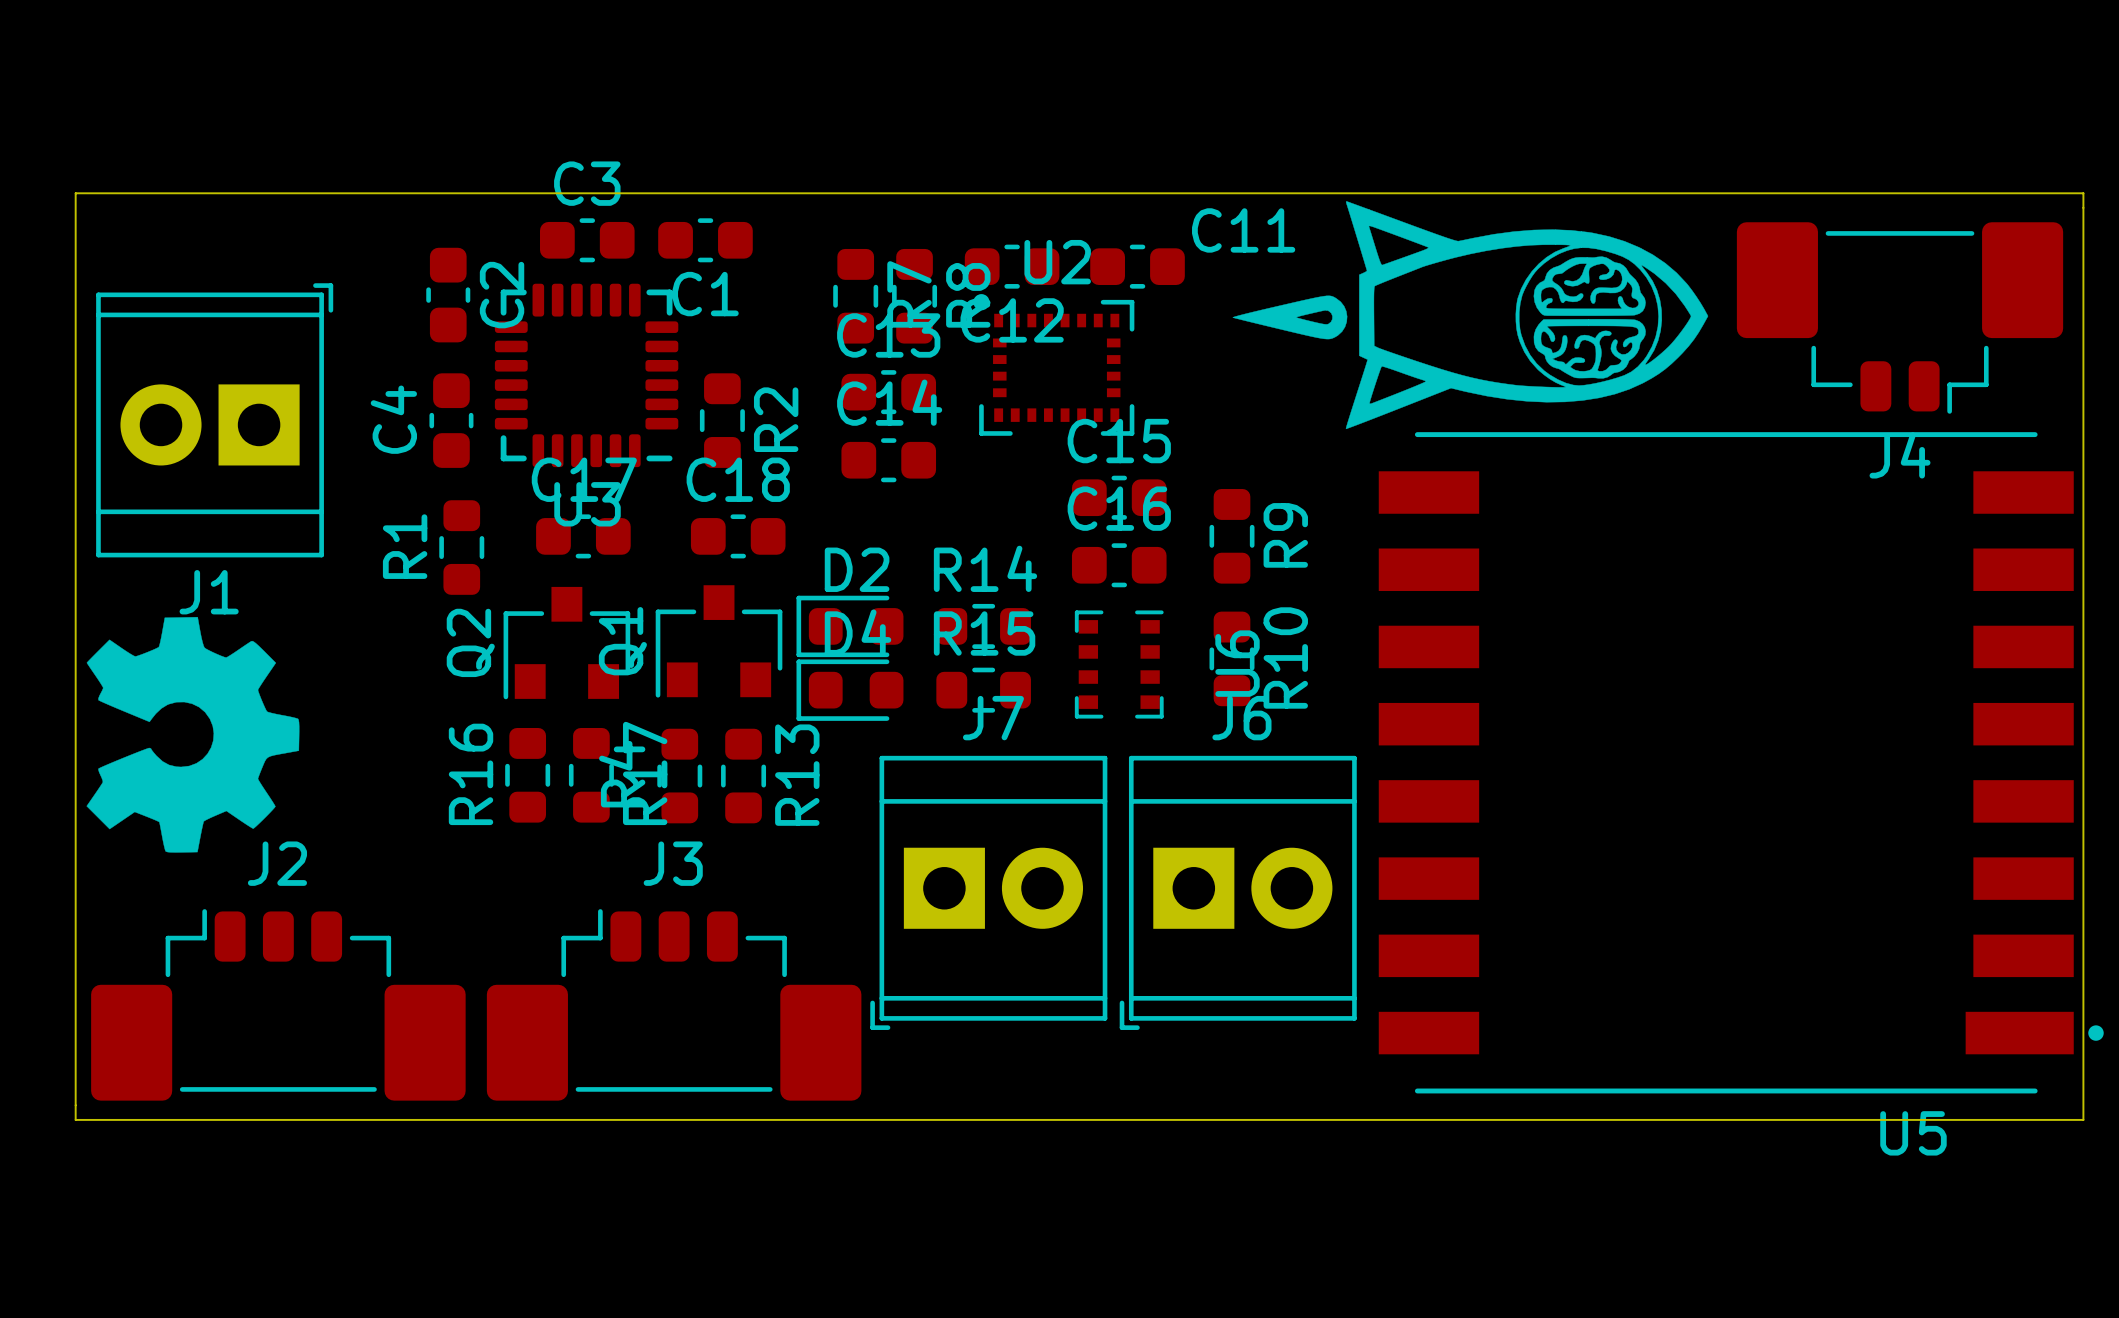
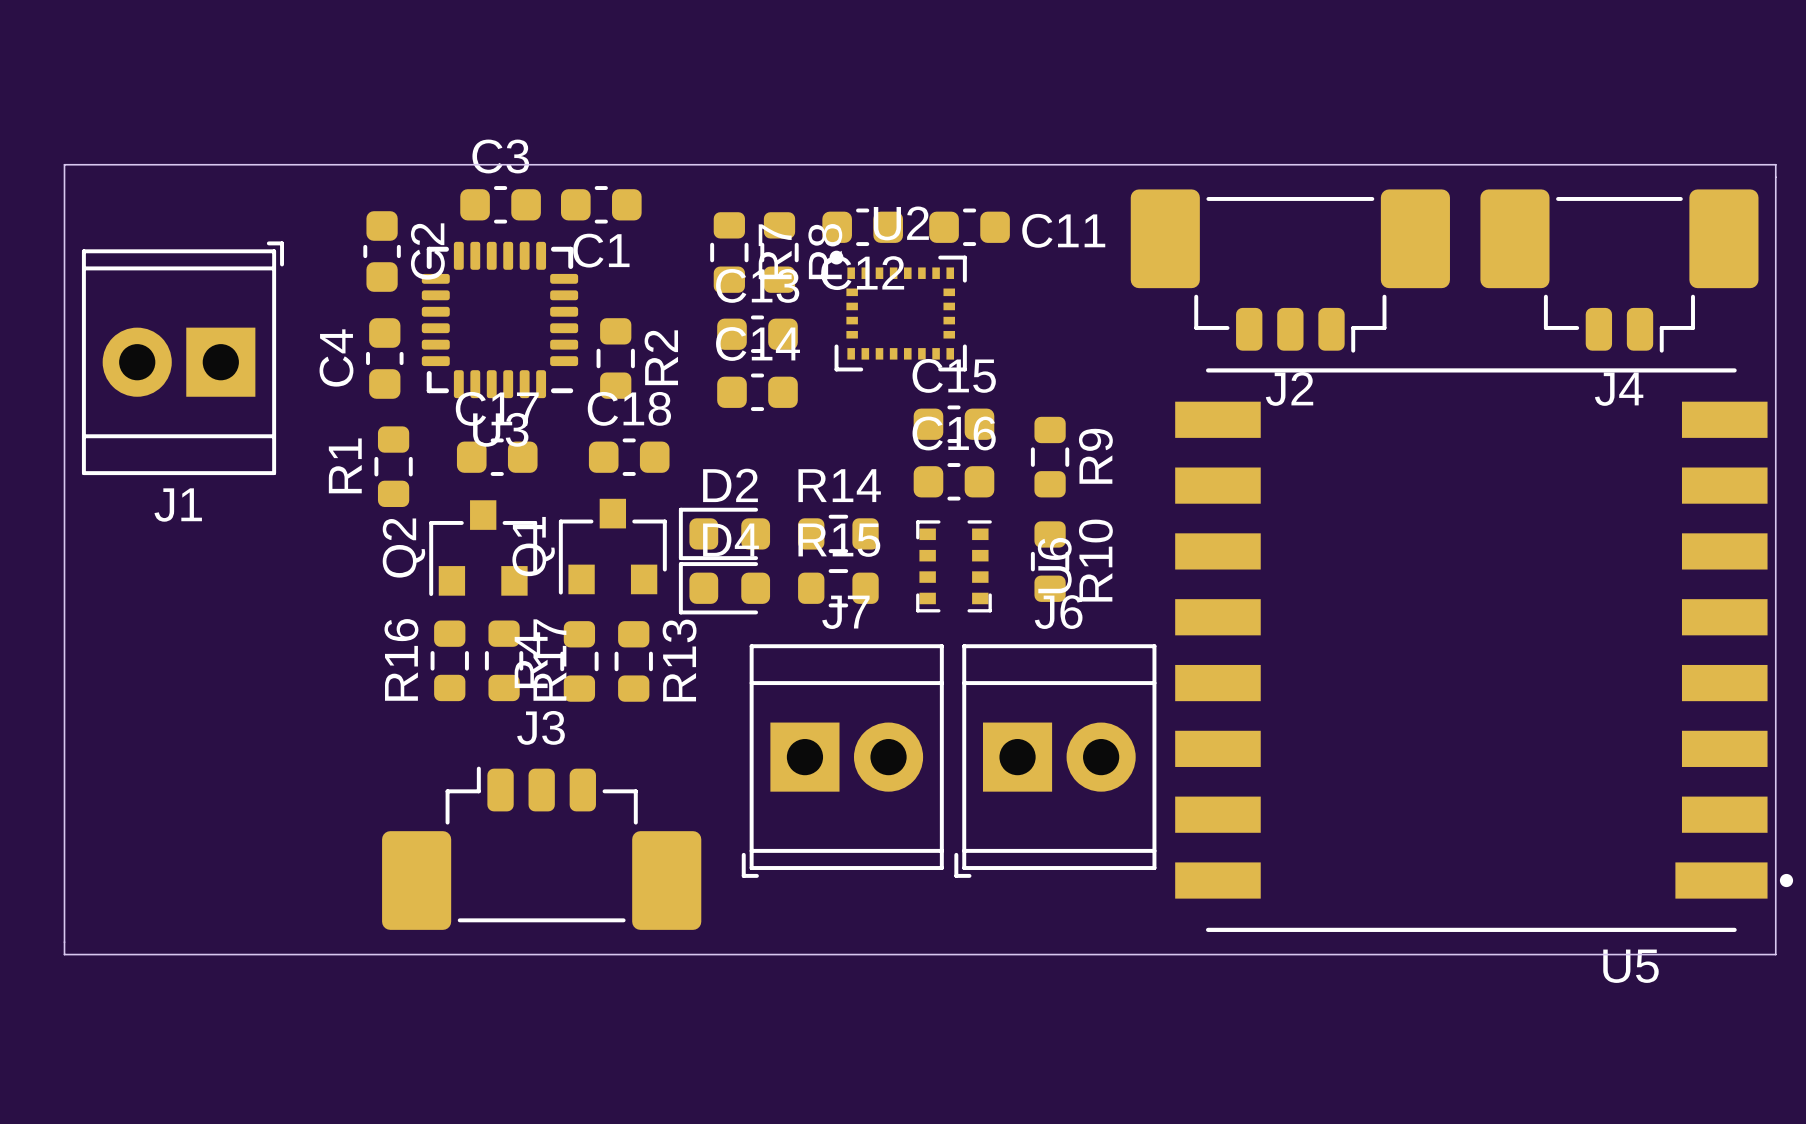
drawing: [1232, 201, 1709, 430] -> none
C11 name position: C11 (1243, 230) -> C11 (1063, 230)
drawing: [86, 616, 300, 853] -> none
J2 rotation: 0° (278, 1004) -> 180° (1290, 271)
J2 position: (278, 1004) -> (1290, 271)
J3 position: (674, 1004) -> (541, 848)

